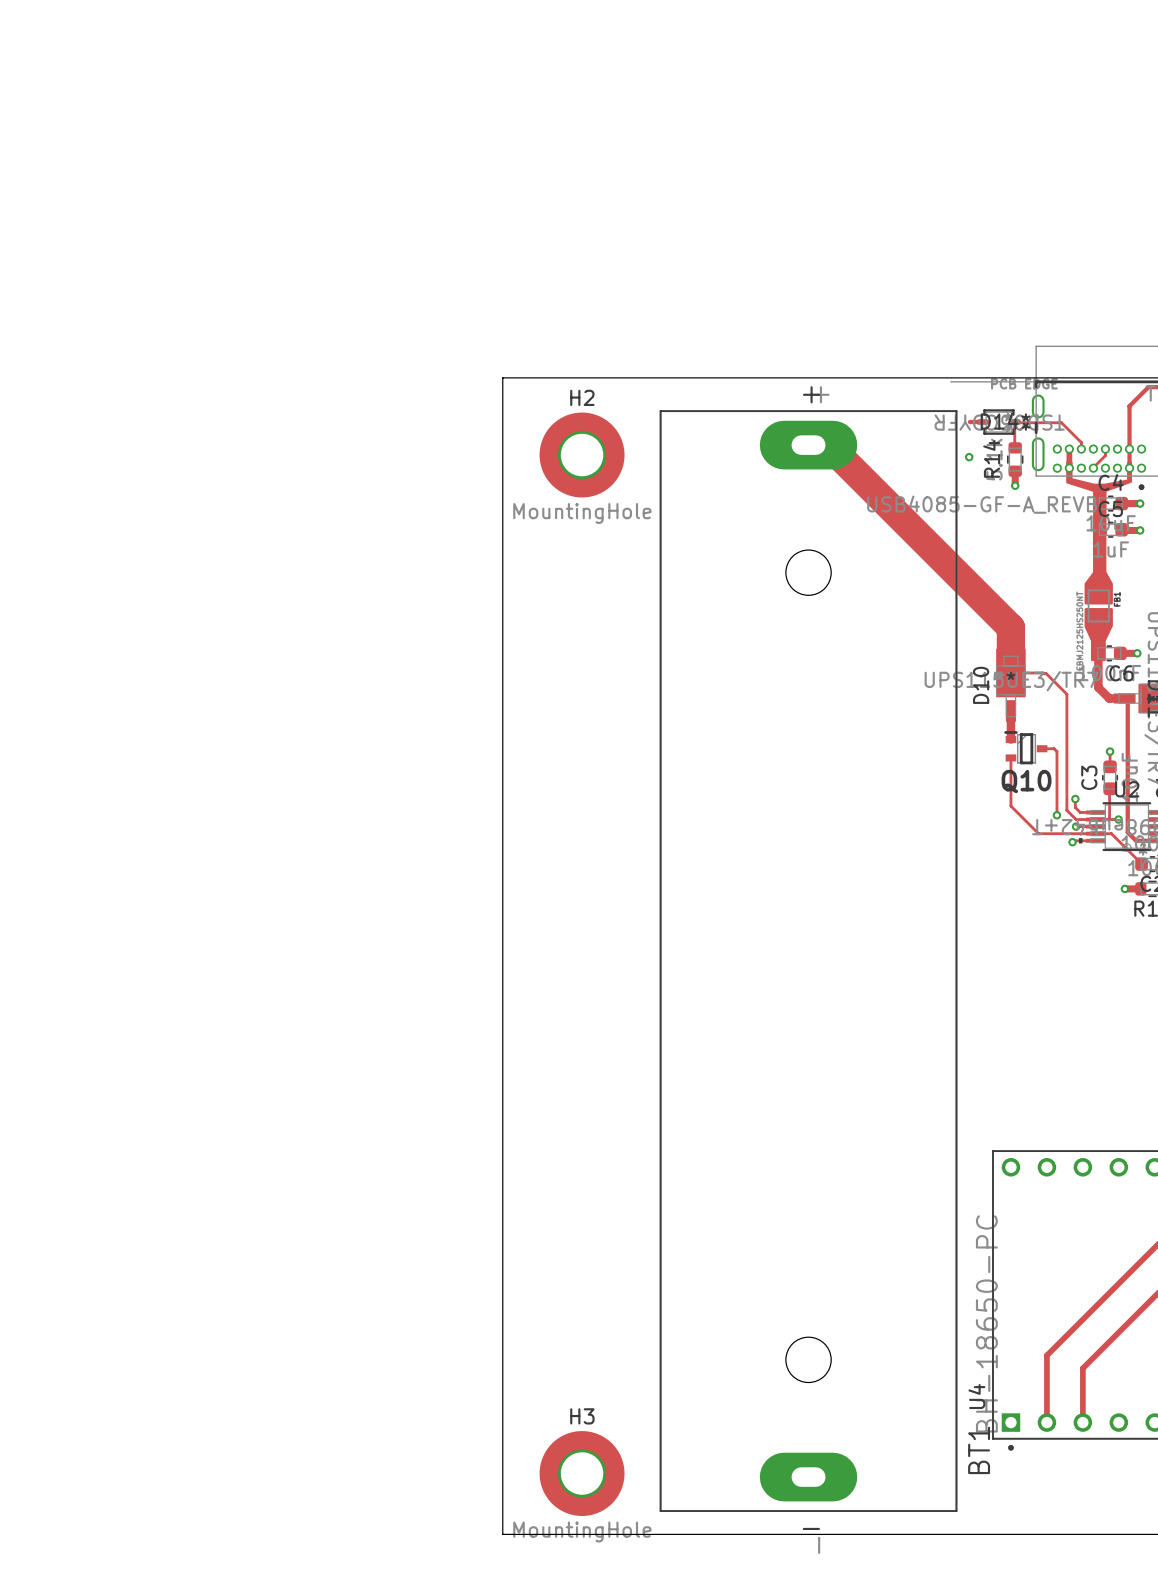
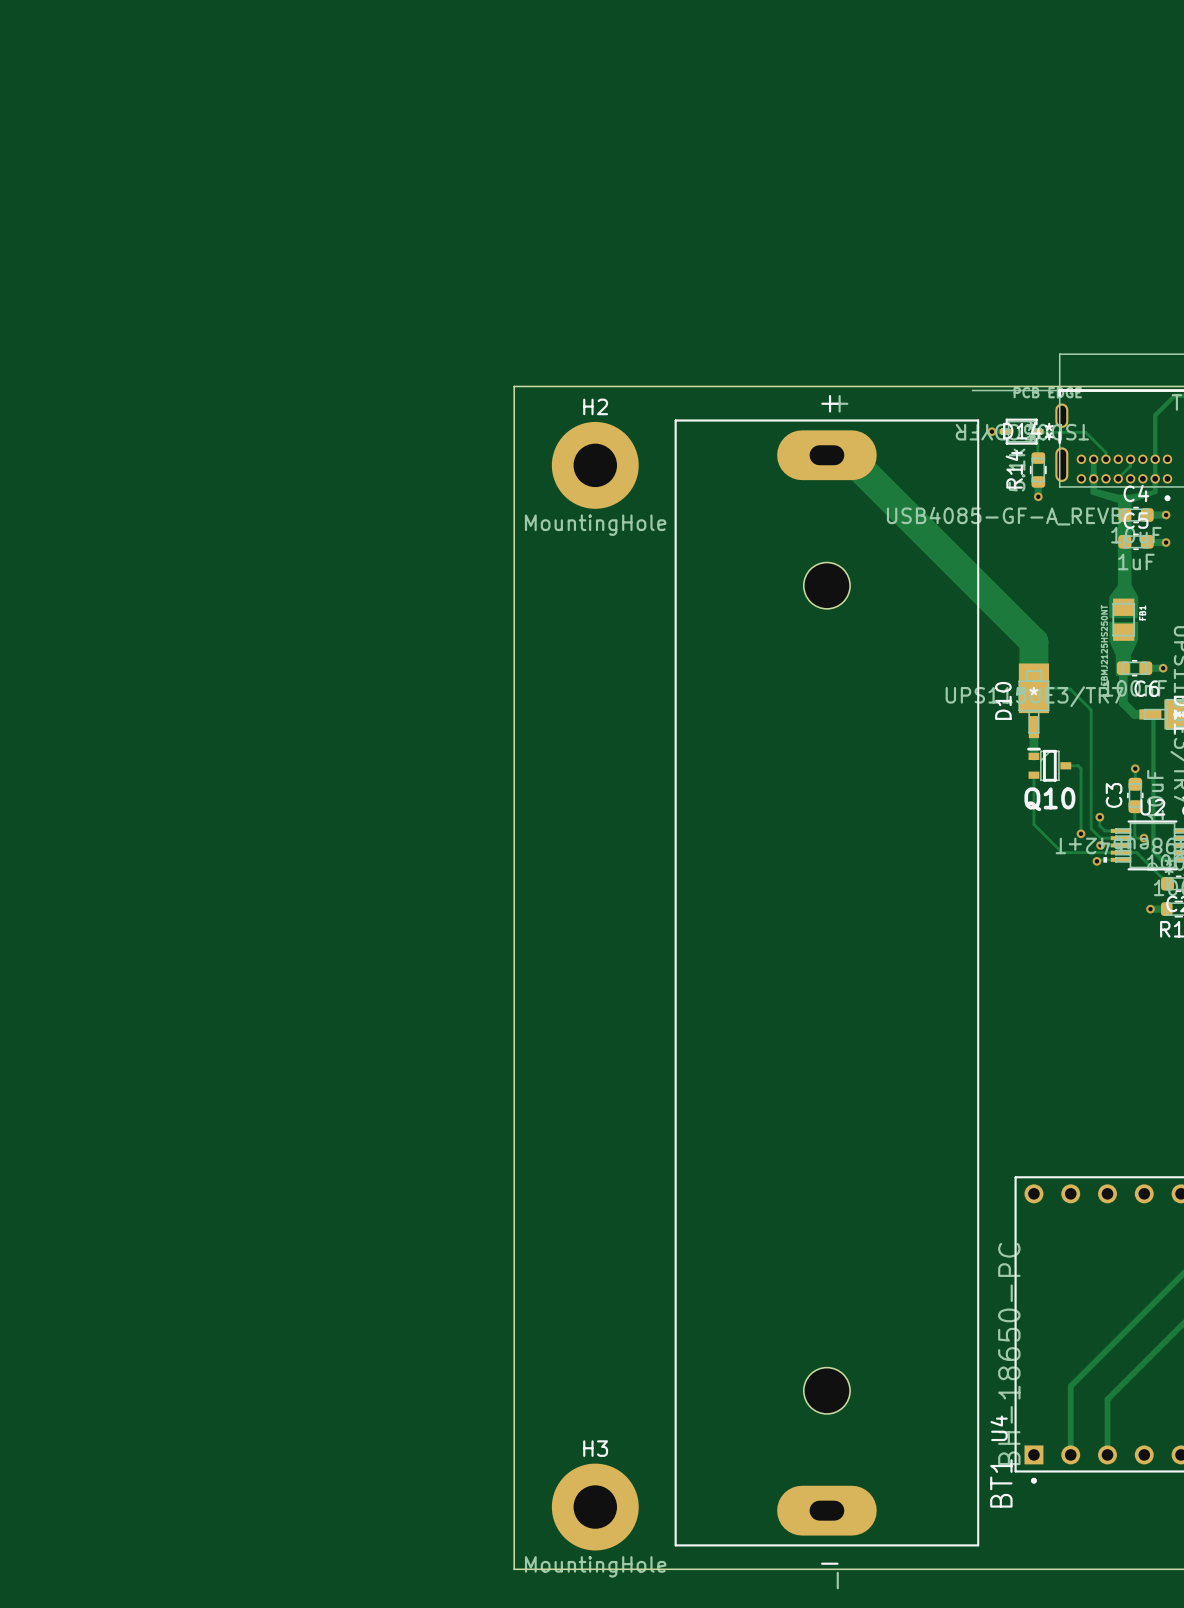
via position: (969, 457) -> (991, 431)

